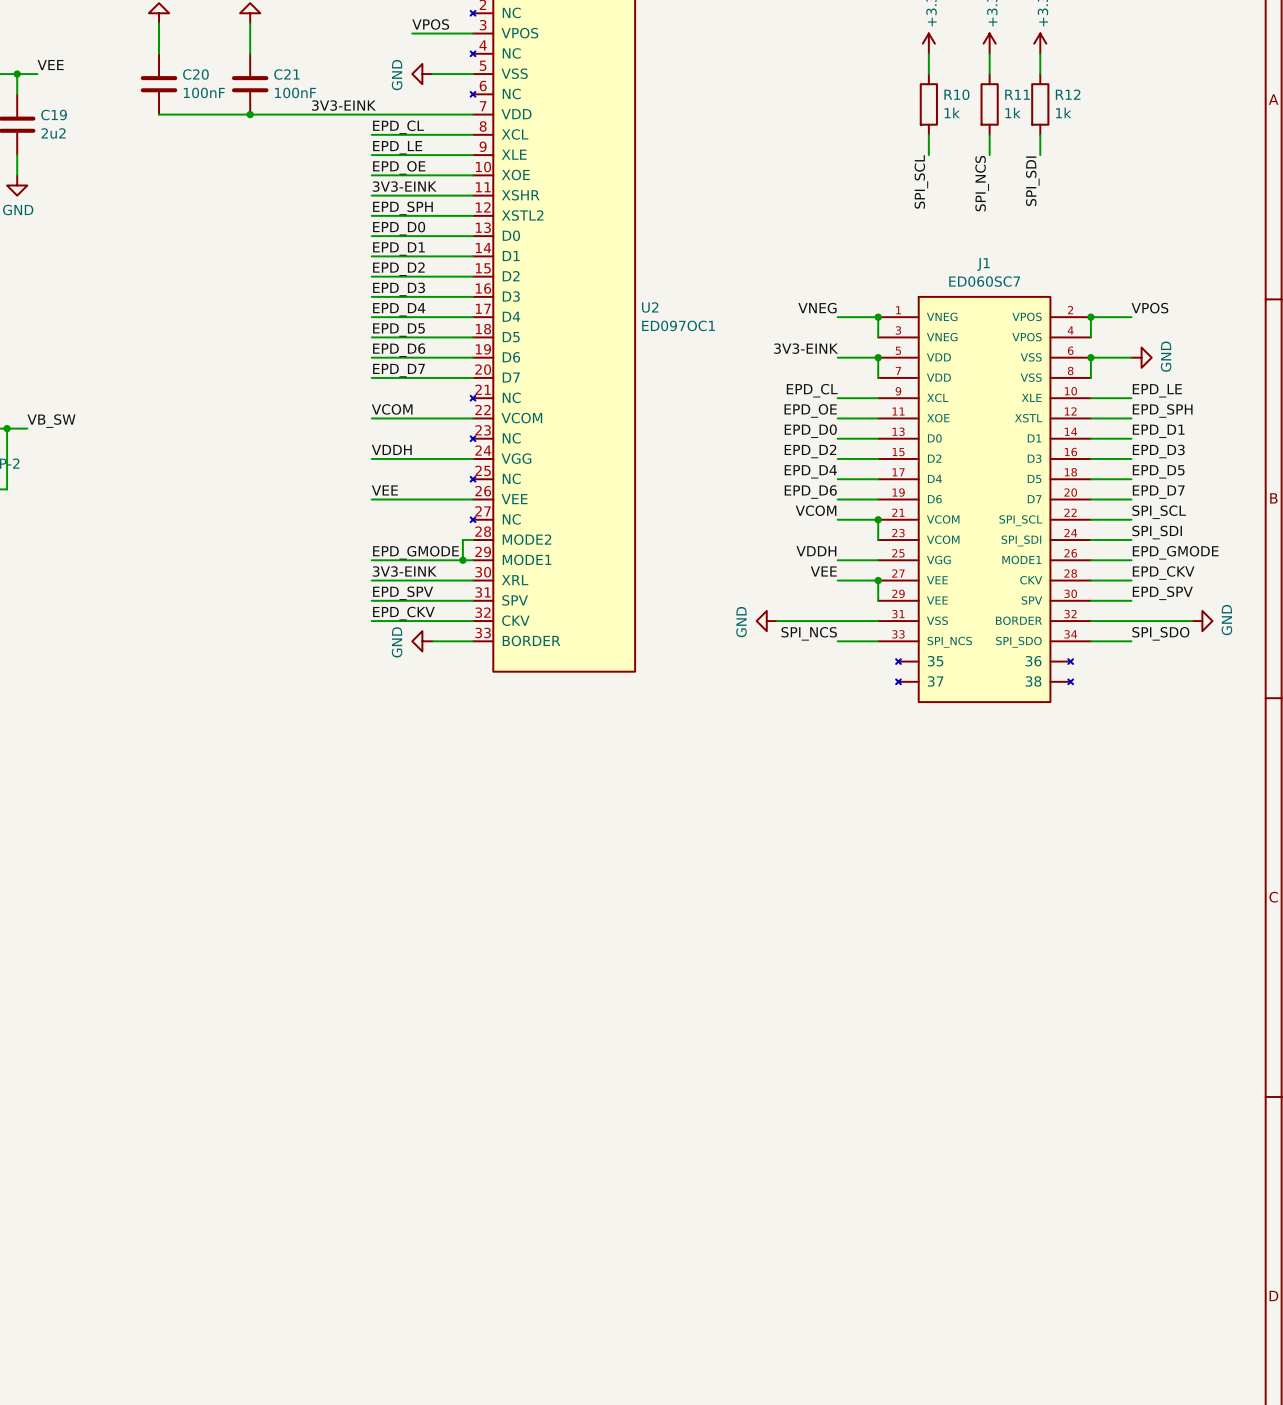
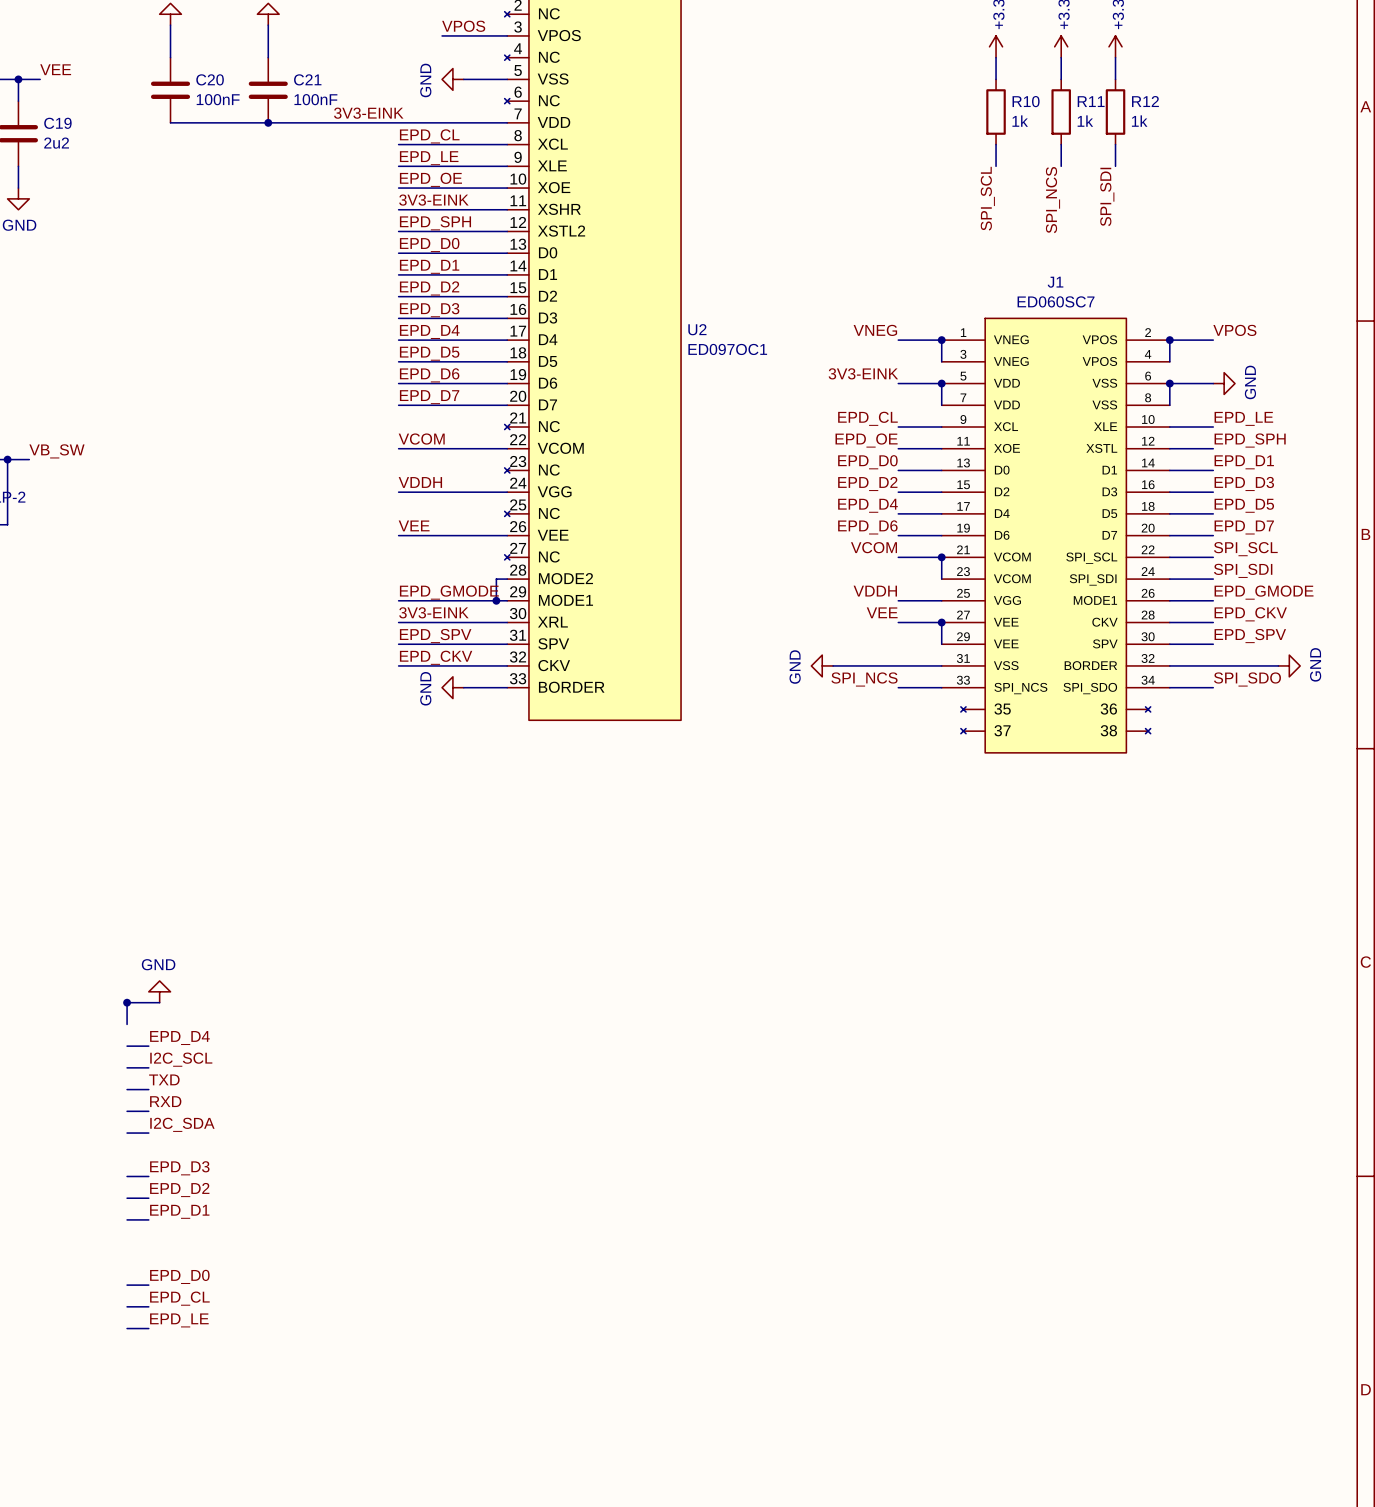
power symbol: none -> GND (159, 991)
junction: none -> (127, 1002)
wire: none -> (159, 1002) (127, 1002) (127, 1024)
label: none -> EPD_D4 (179, 1038)
wire: none -> (127, 1046) (148, 1046)
label: none -> I2C_SCL (181, 1059)
wire: none -> (127, 1067) (148, 1067)
label: none -> TXD (164, 1079)
wire: none -> (127, 1089) (148, 1089)
label: none -> RXD (165, 1101)
wire: none -> (127, 1111) (148, 1111)
label: none -> I2C_SDA (182, 1124)
wire: none -> (127, 1133) (148, 1133)
label: none -> EPD_D3 (179, 1168)
wire: none -> (127, 1176) (148, 1176)
label: none -> EPD_D2 (179, 1190)
wire: none -> (127, 1198) (148, 1198)
label: none -> EPD_D1 (179, 1211)
wire: none -> (127, 1219) (148, 1219)
label: none -> EPD_D0 (179, 1276)
wire: none -> (127, 1285) (148, 1285)
label: none -> EPD_CL (179, 1298)
wire: none -> (127, 1306) (148, 1306)
label: none -> EPD_LE (179, 1320)
wire: none -> (127, 1328) (148, 1328)

